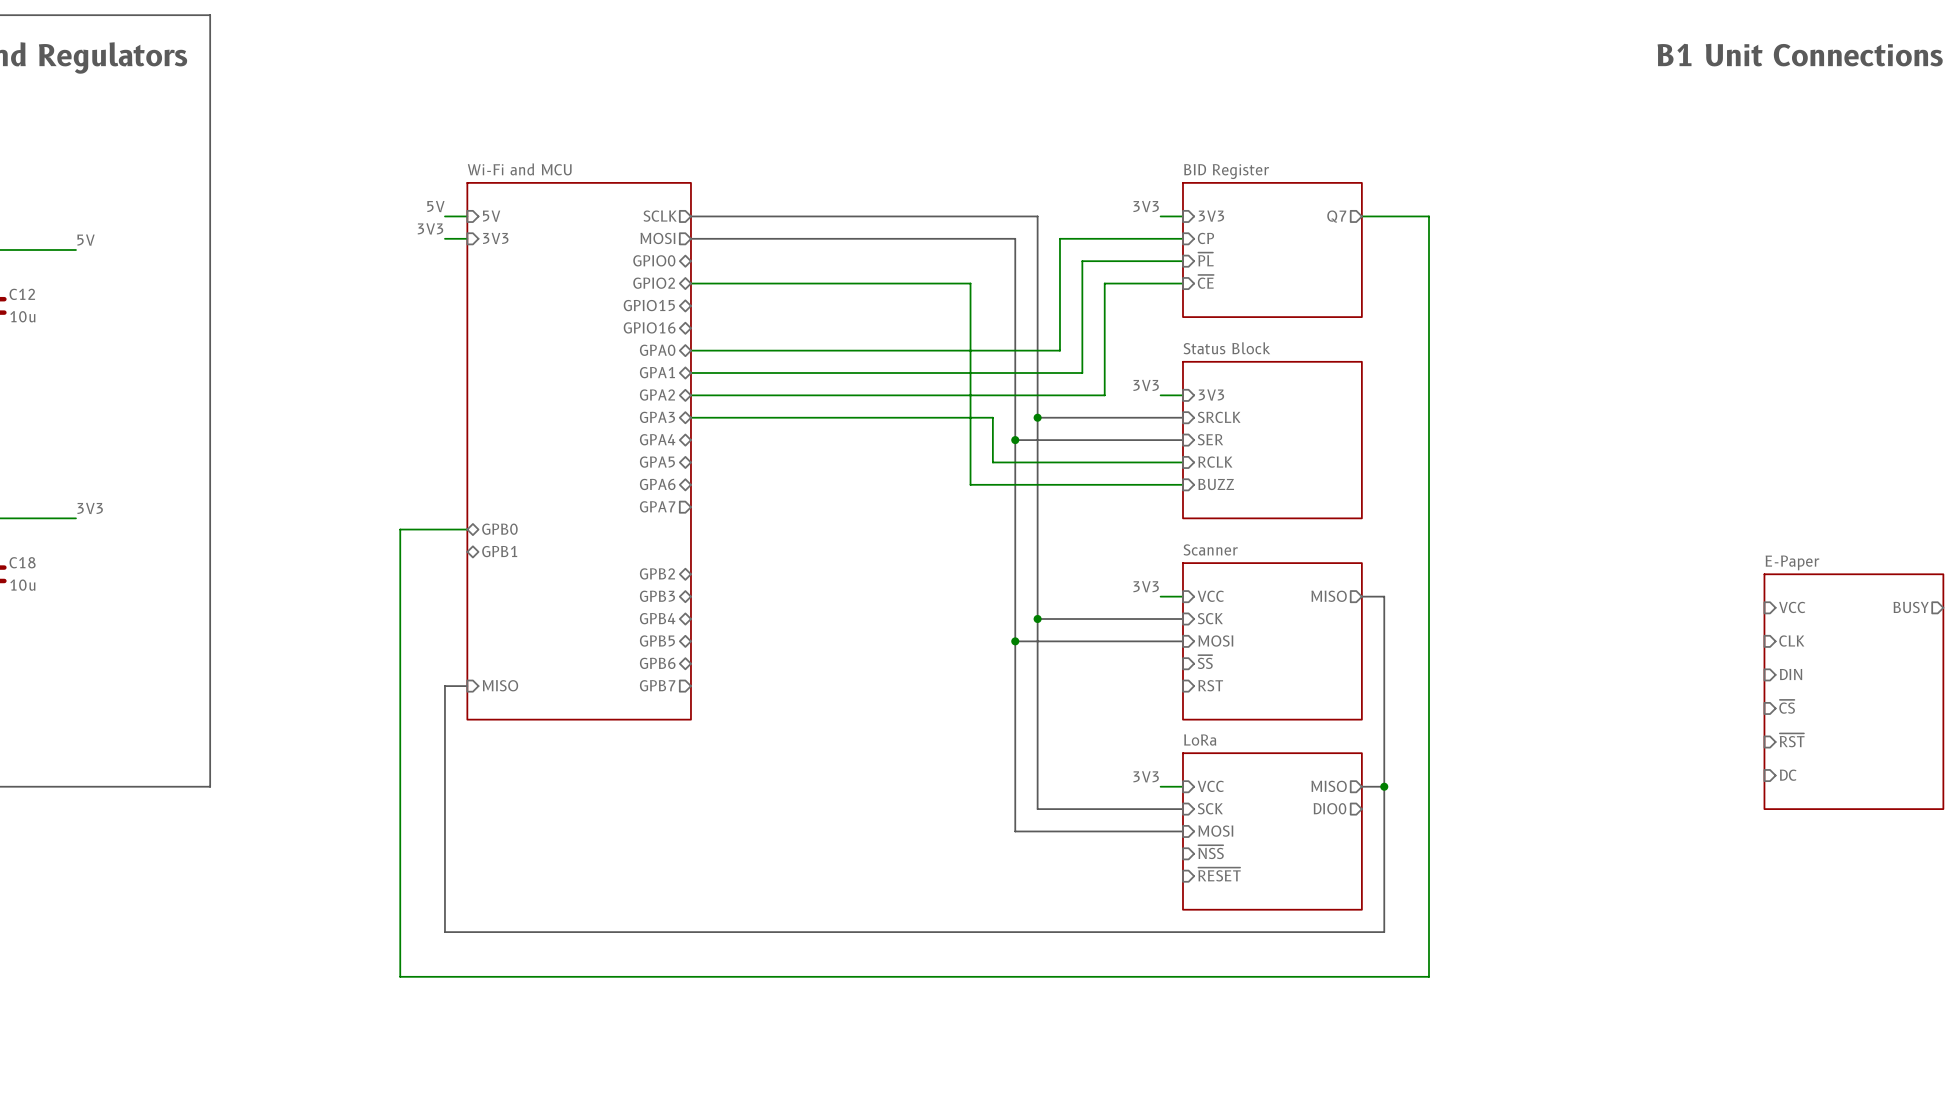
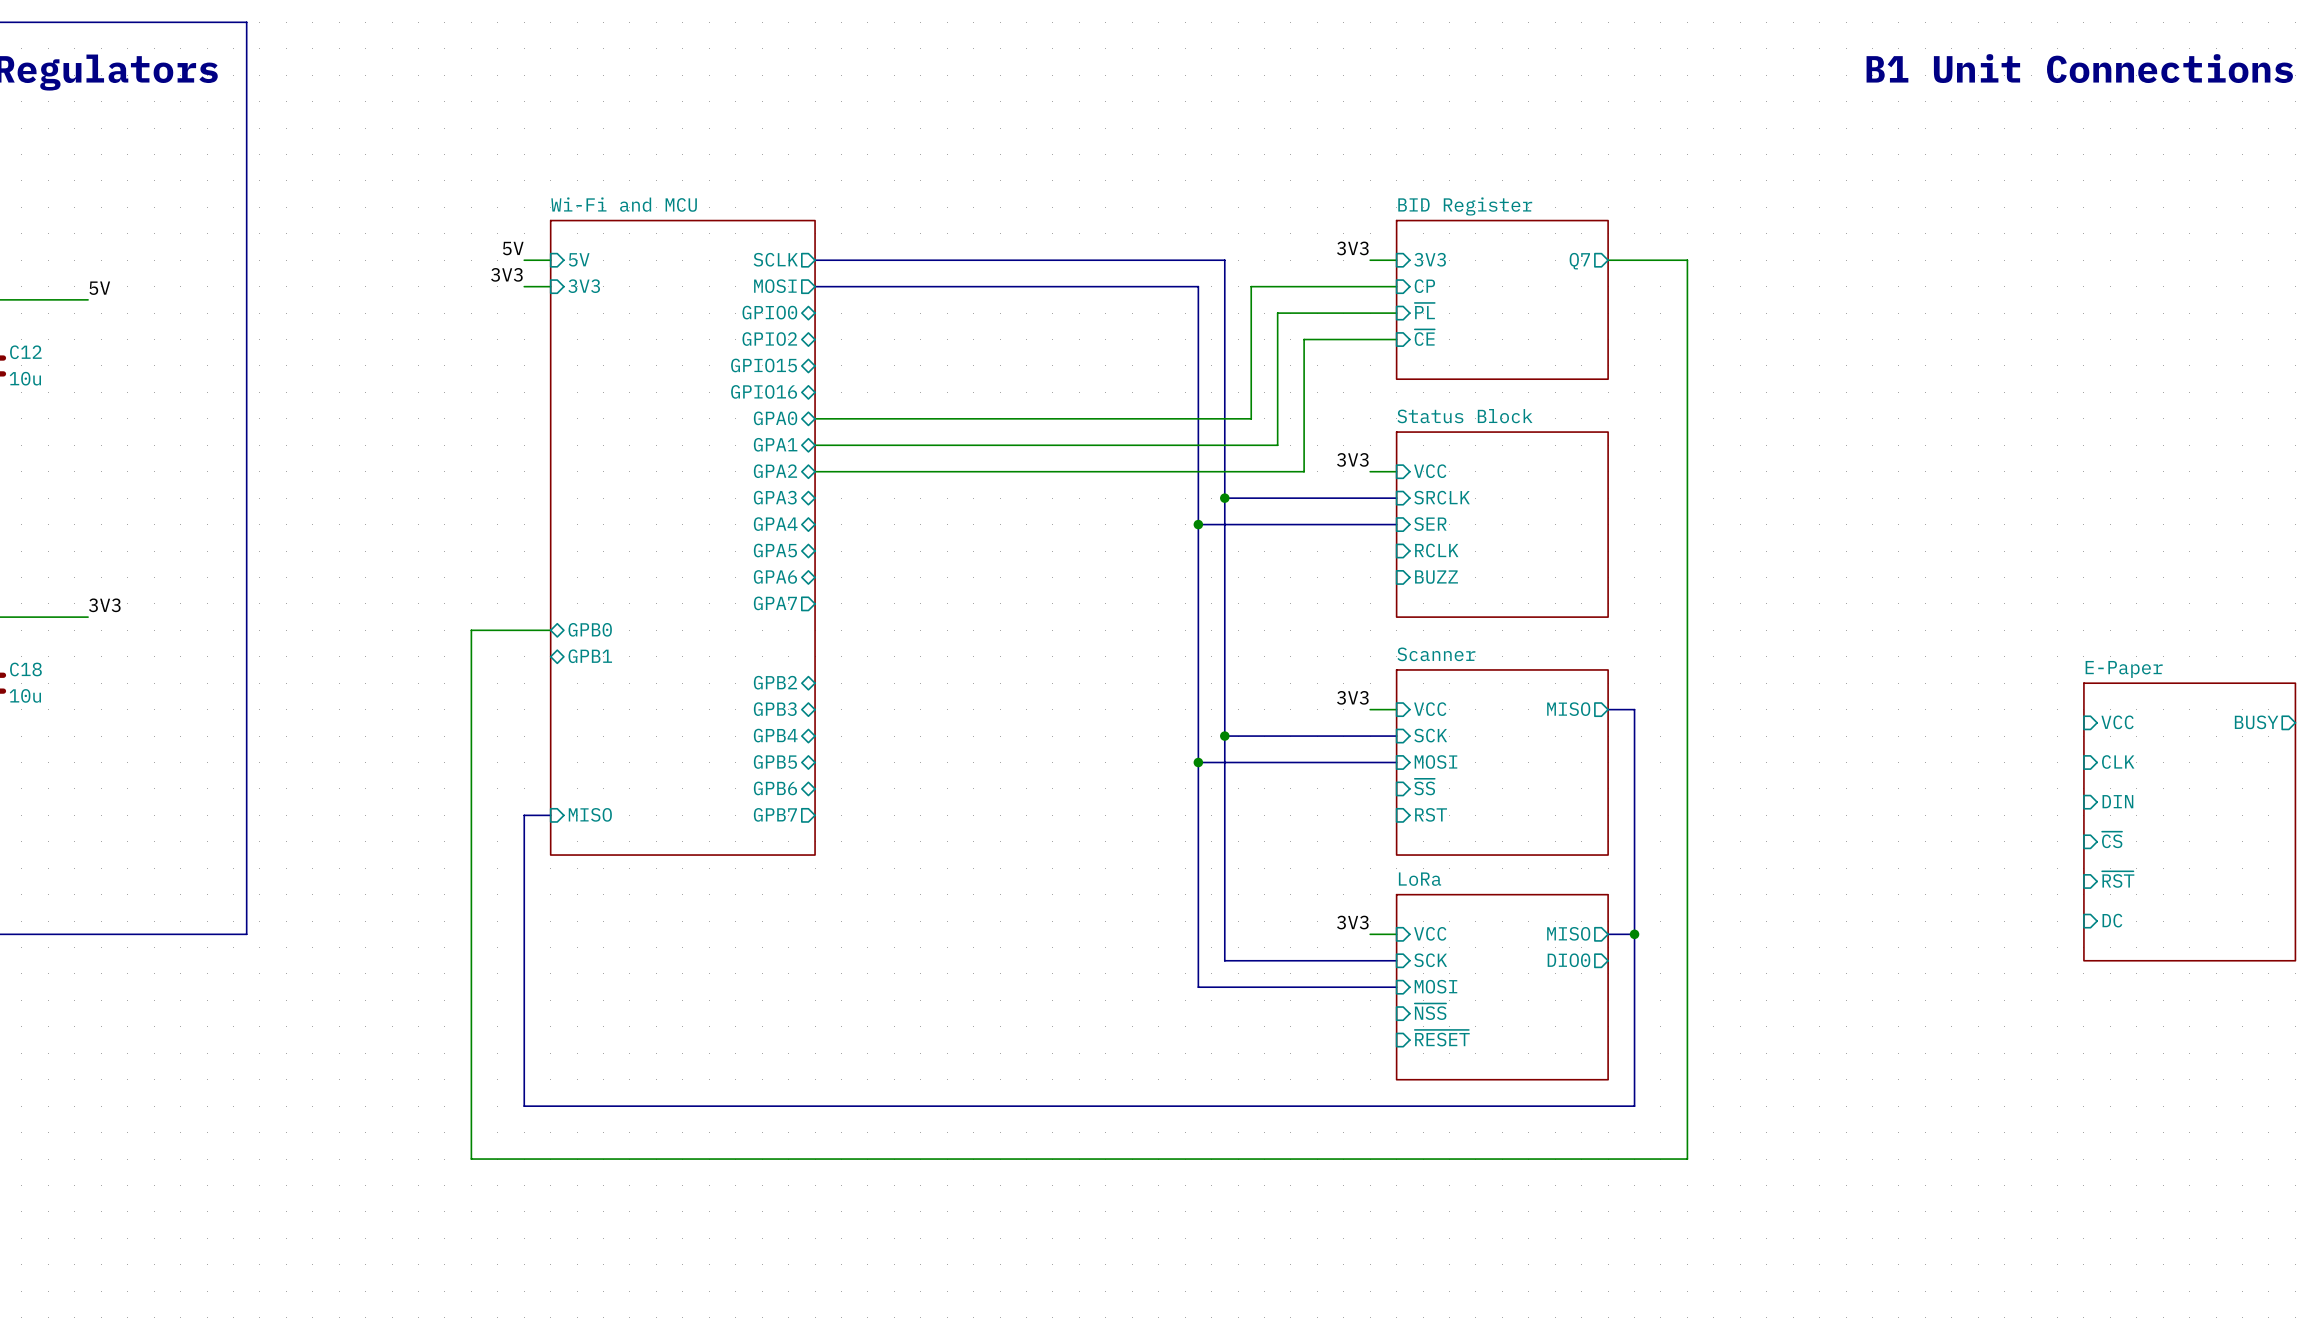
wire: (690, 283) (970, 283) (970, 484) (1182, 484) -> none
sheet pin: 3V3 (1211, 395) -> VCC (1430, 471)
wire: (690, 417) (992, 417) (992, 462) (1182, 462) -> none

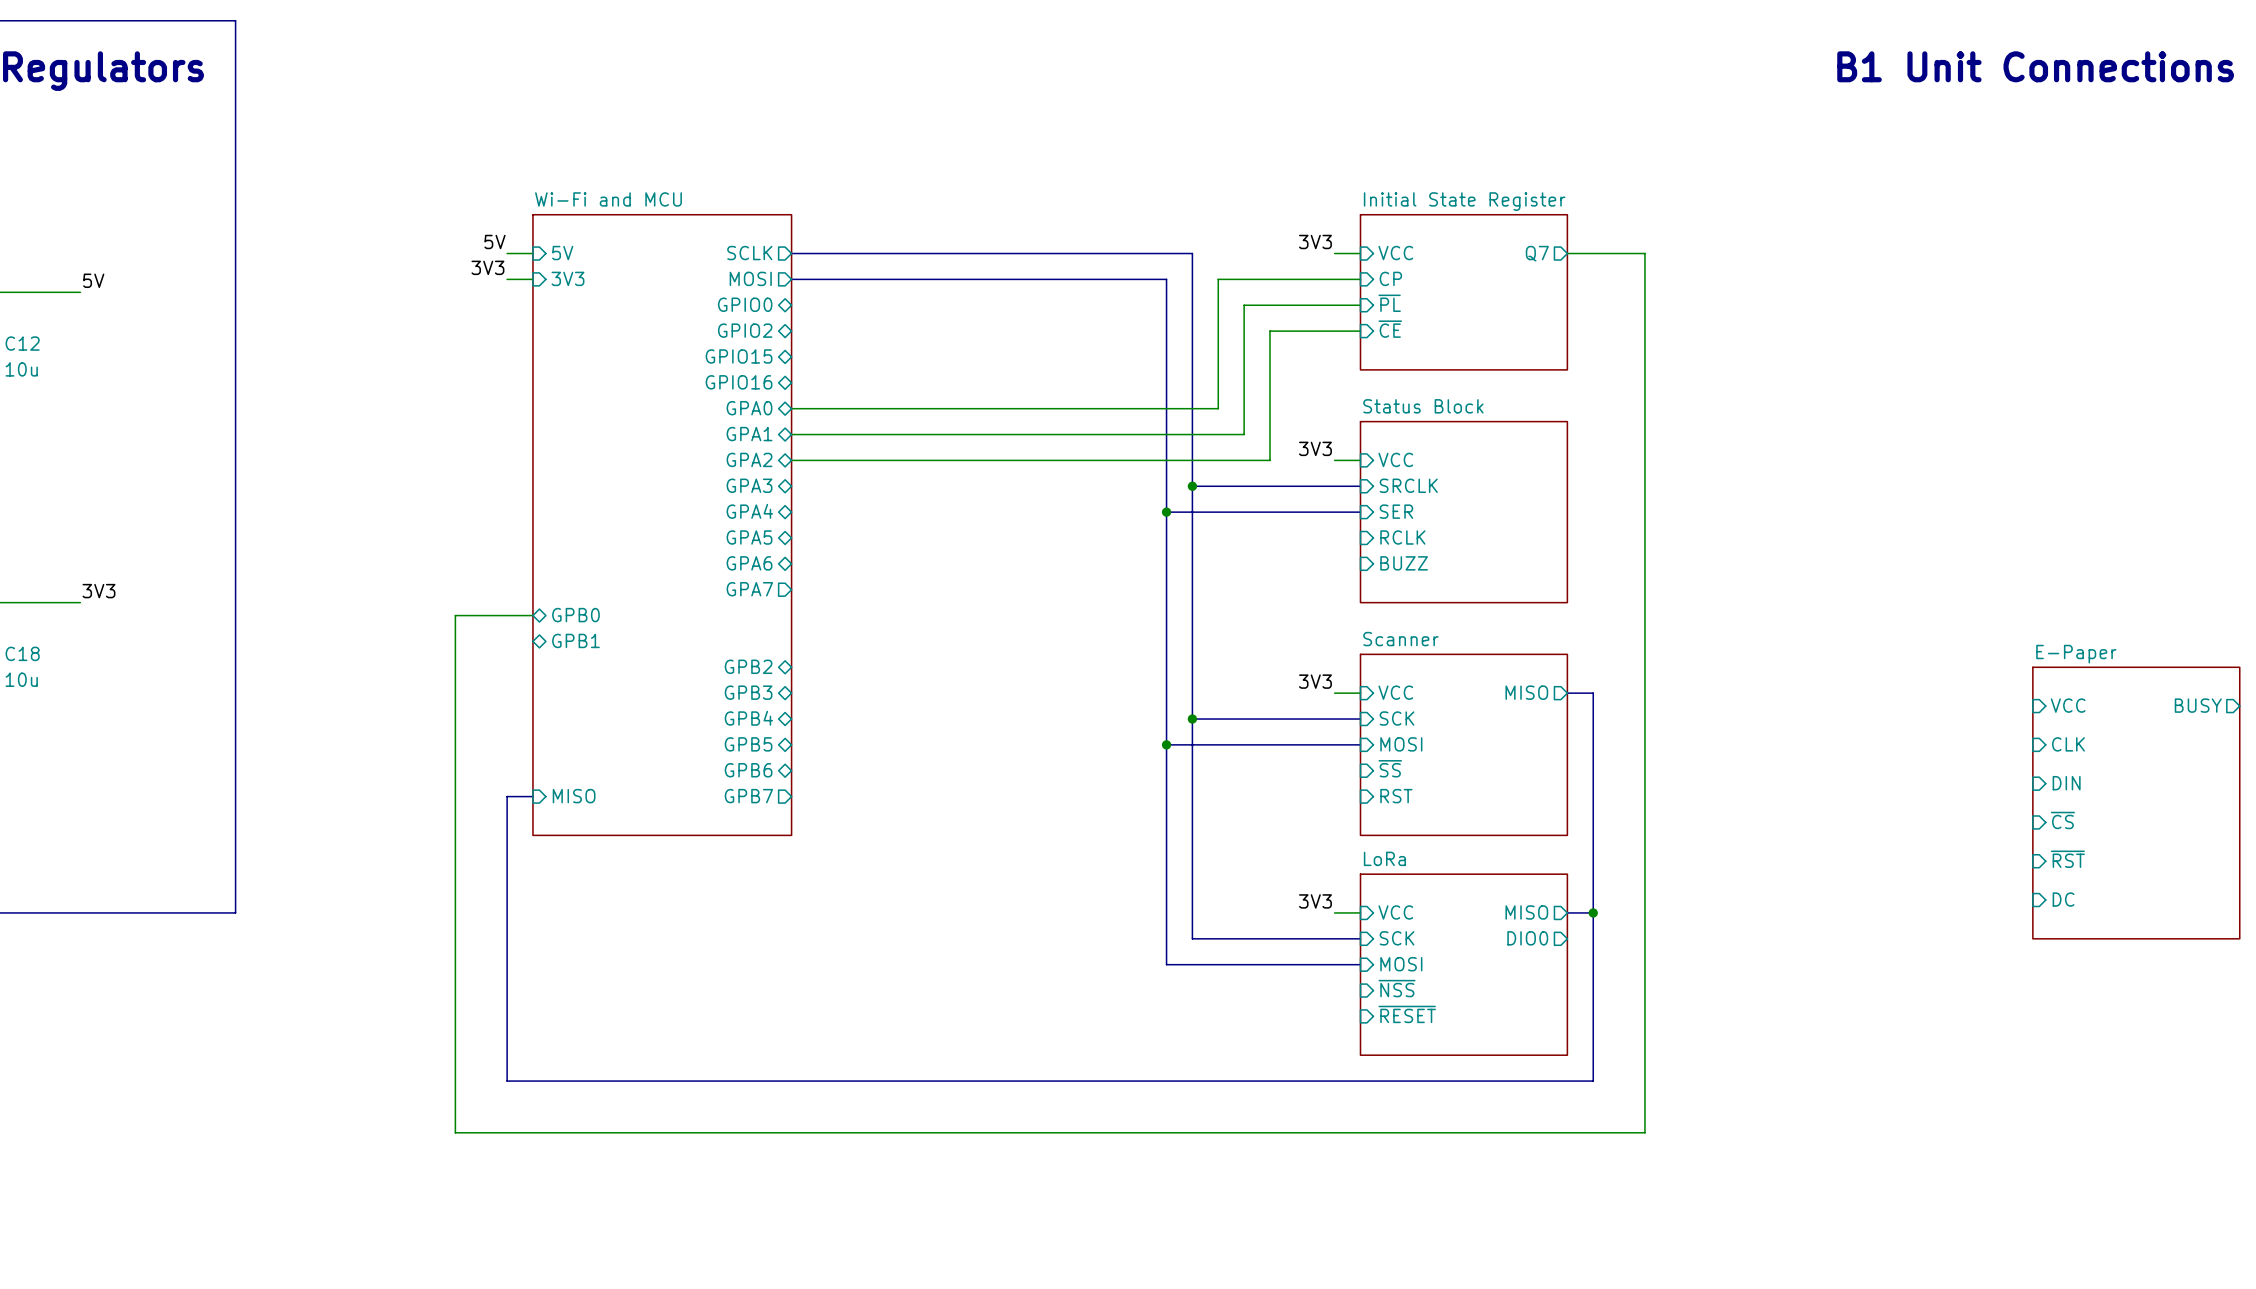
sheet BID Register name: BID Register (1465, 206) -> Initial State Register (1464, 201)
sheet pin: 3V3 (1430, 259) -> VCC (1395, 253)

